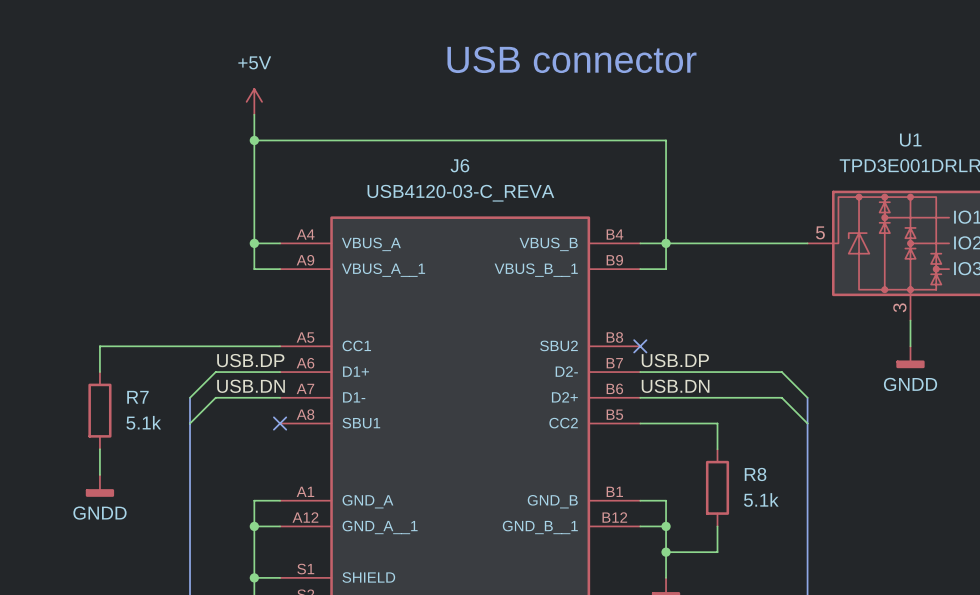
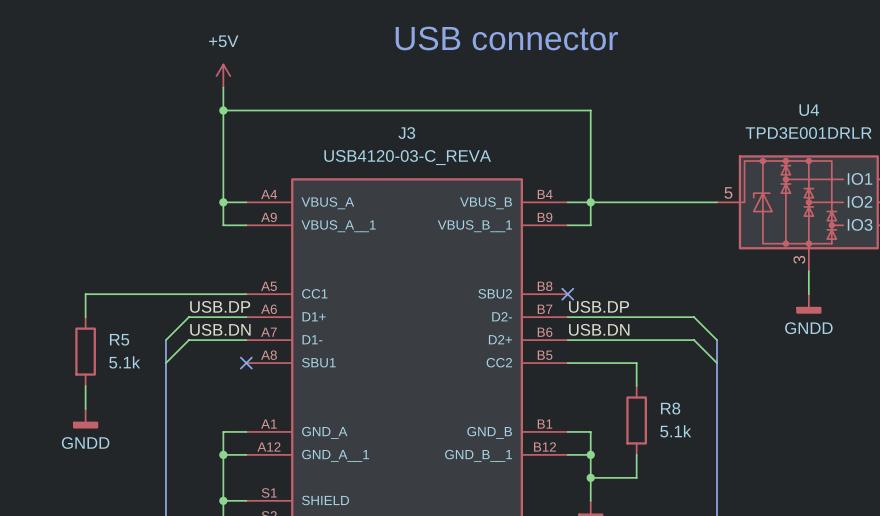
U1 name: U1 (910, 140) -> U4 (809, 110)
J6 name: J6 (459, 165) -> J3 (406, 133)
R7 name: R7 (137, 397) -> R5 (119, 339)

